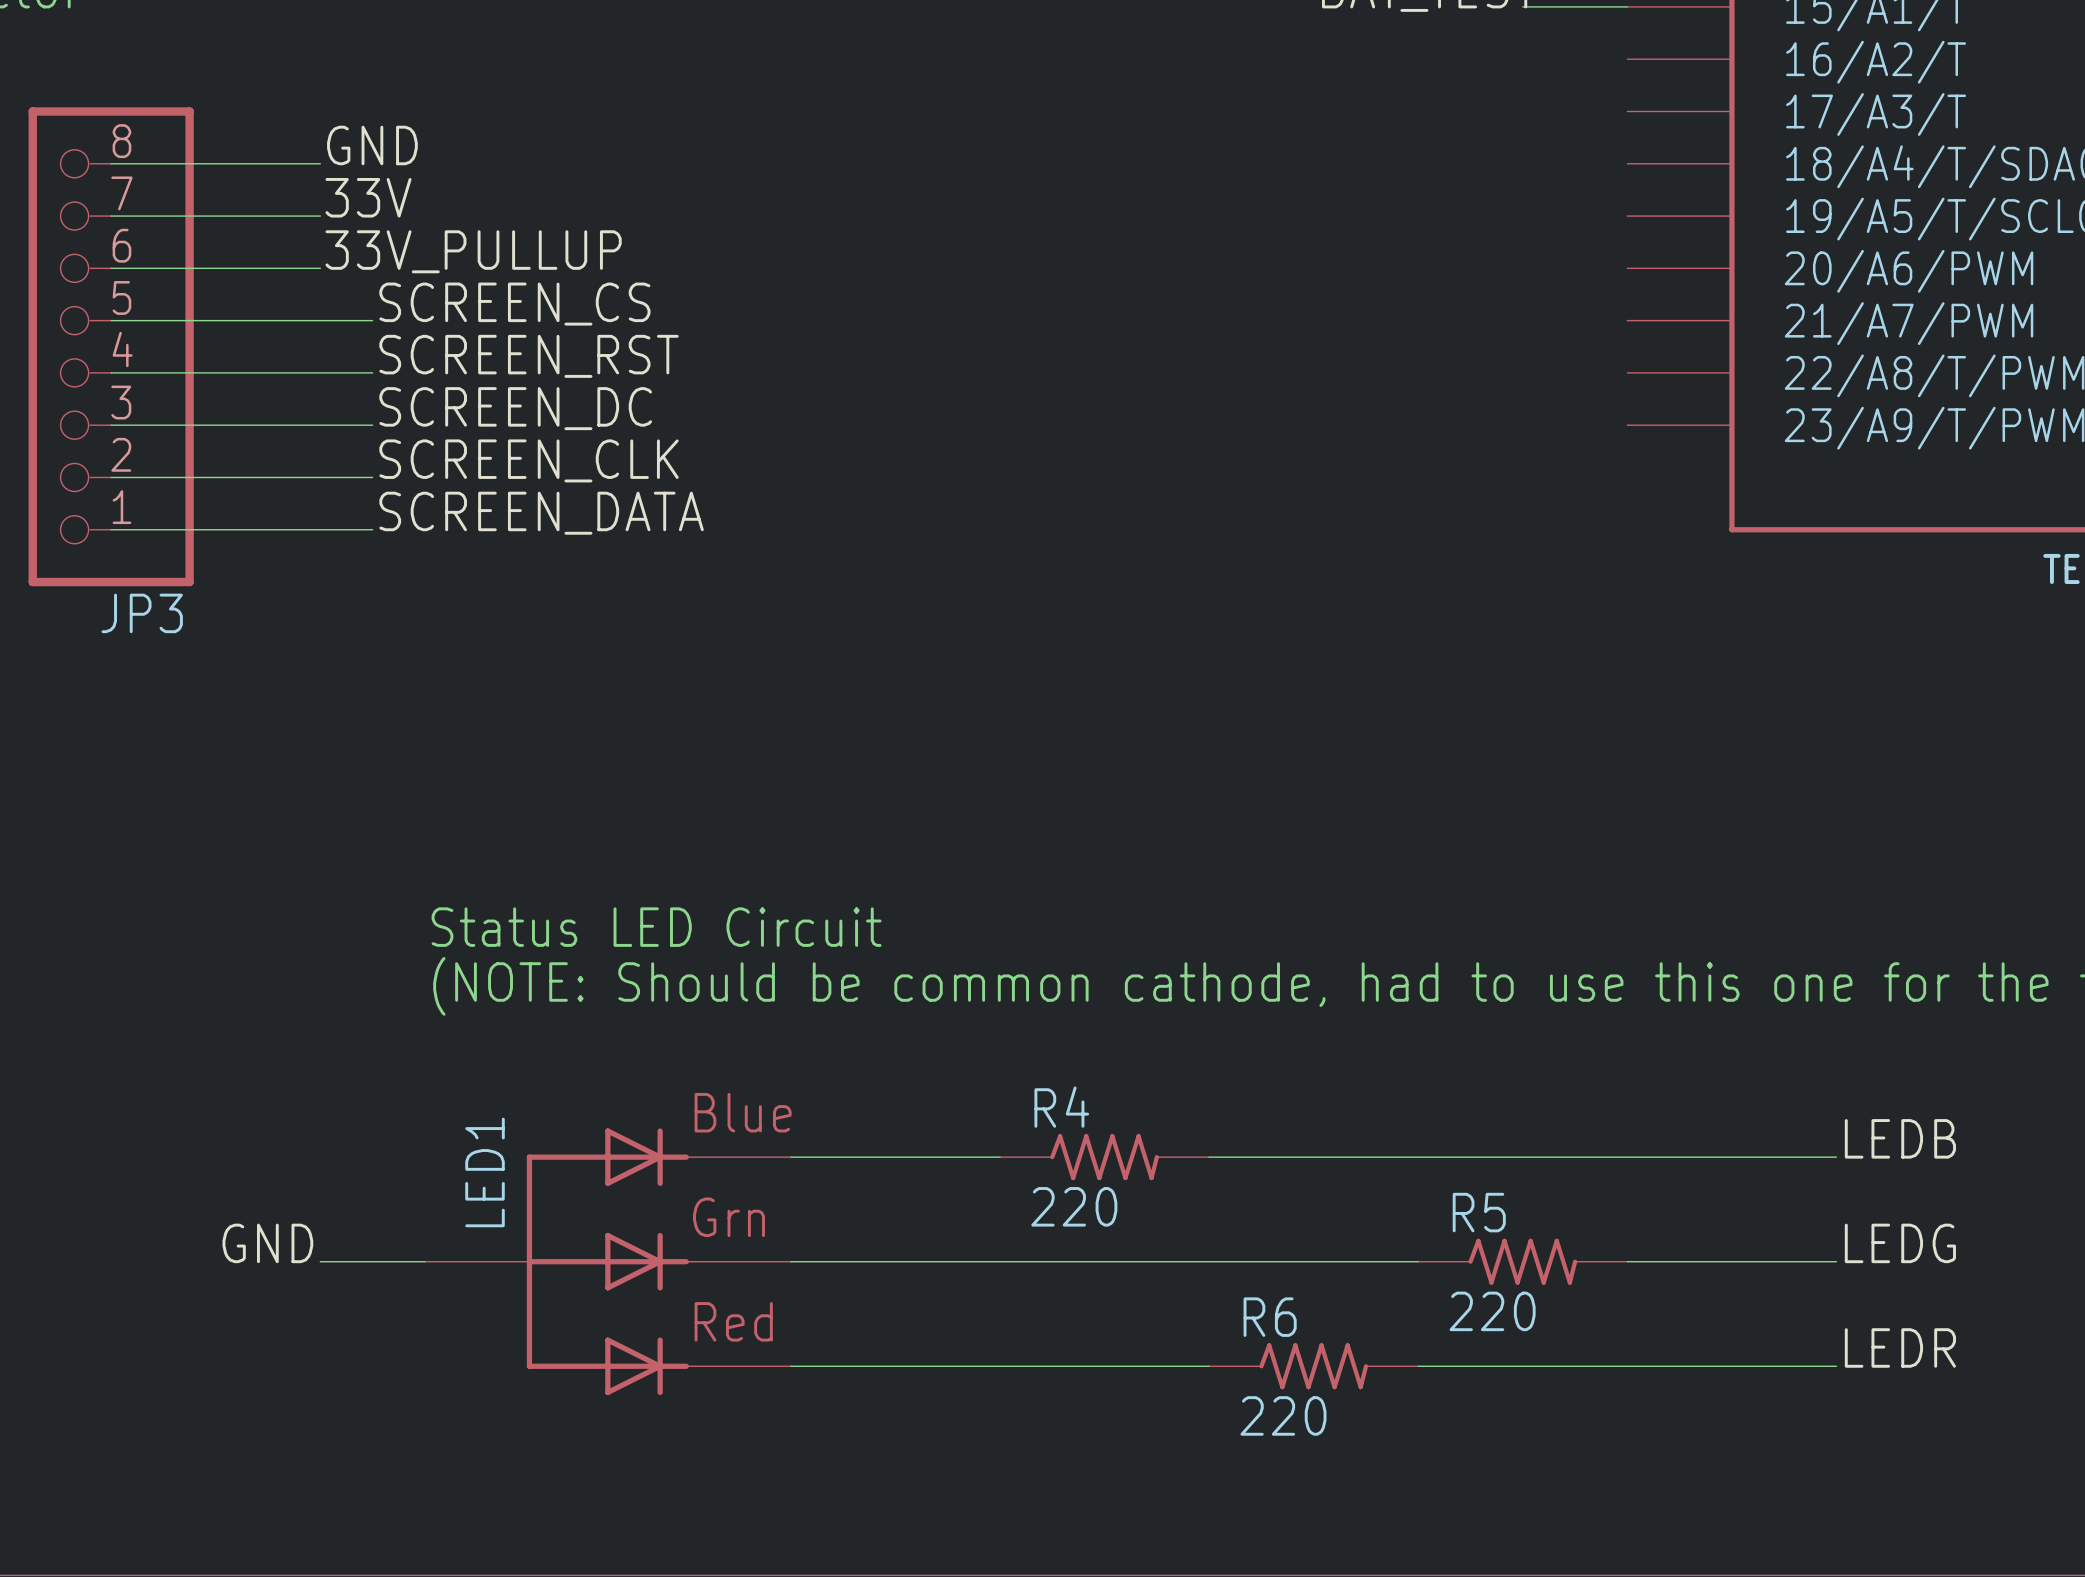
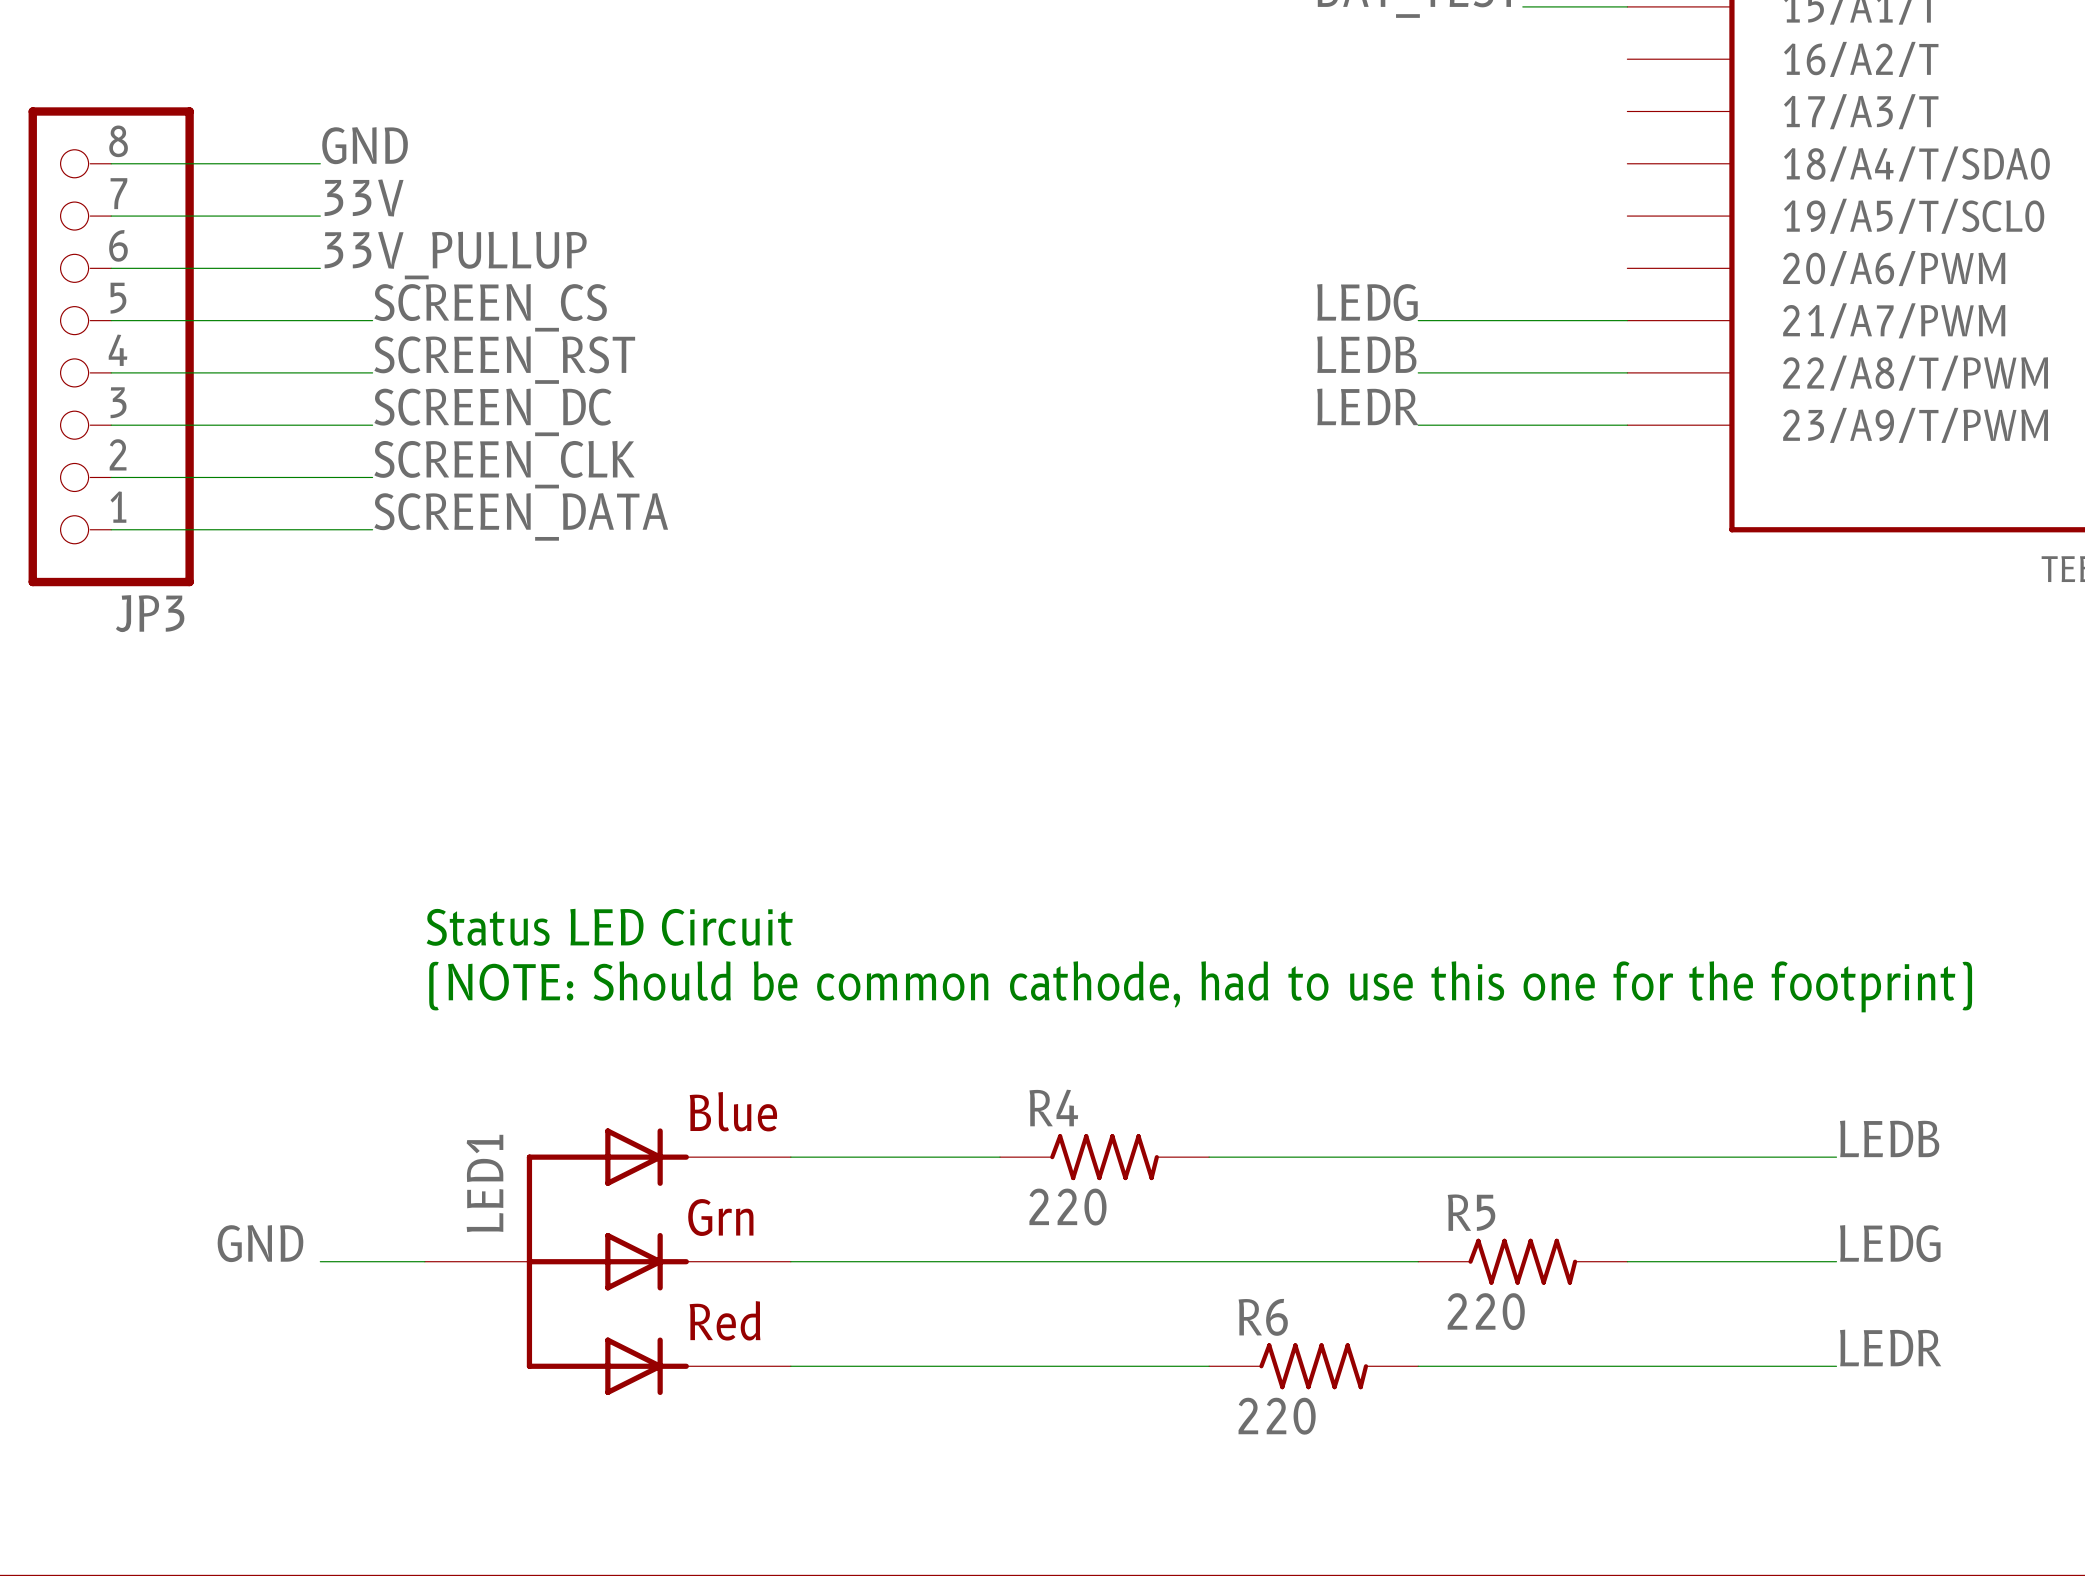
label: none -> LEDG (1367, 302)
wire: none -> (1418, 320) (1627, 320)
label: none -> LEDB (1366, 354)
wire: none -> (1418, 372) (1627, 372)
label: none -> LEDR (1367, 406)
wire: none -> (1418, 425) (1627, 425)

